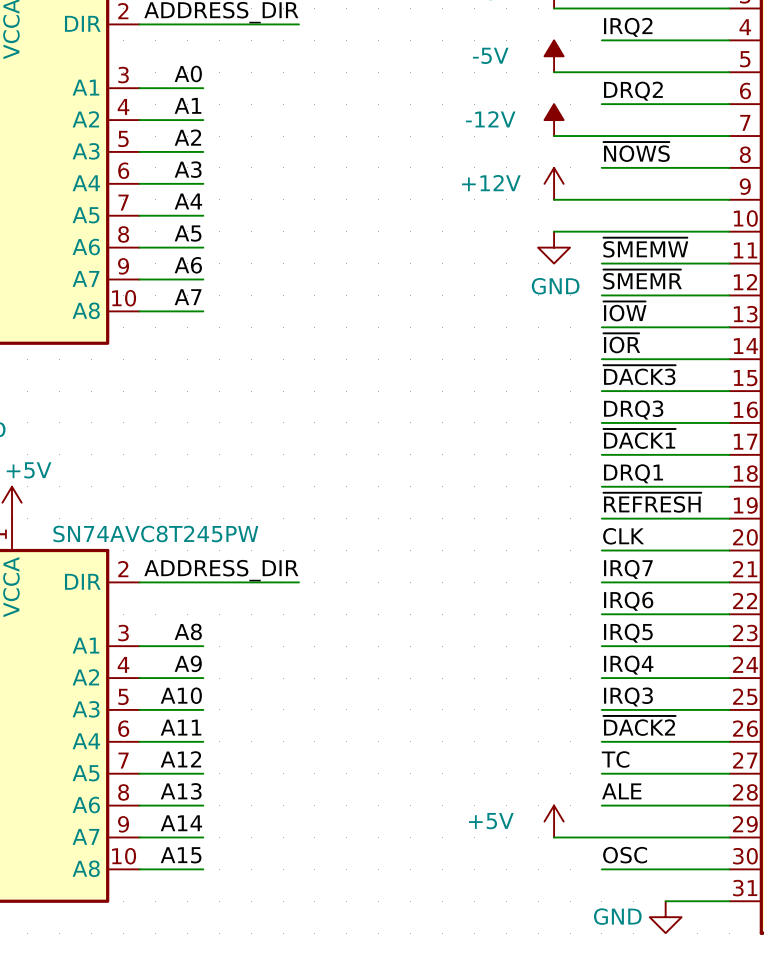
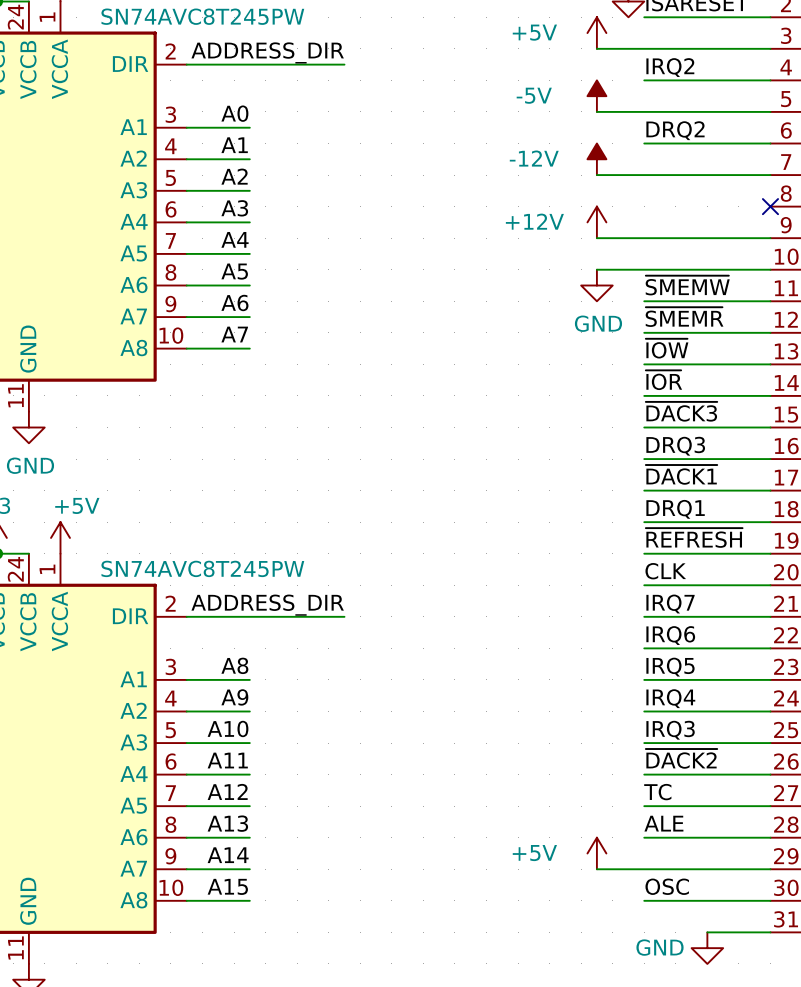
label: ~{NOWS} (636, 151) -> none
wire: (601, 167) (729, 167) -> none
no-connect mark: none -> (770, 206)

